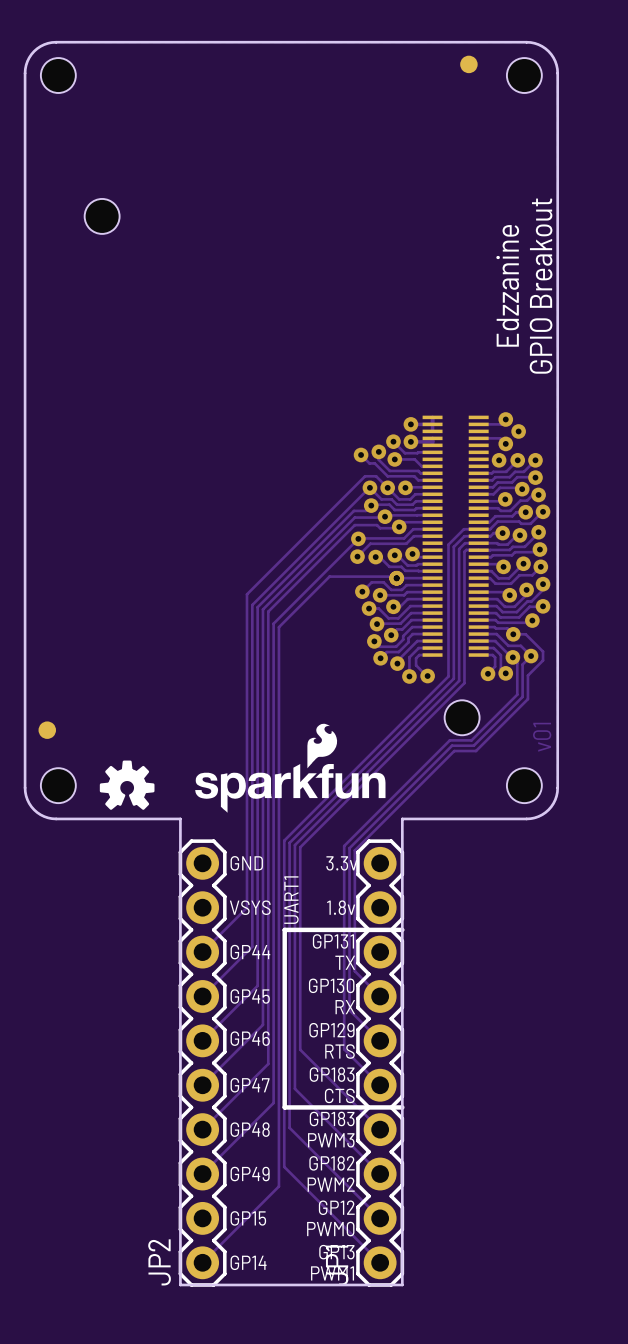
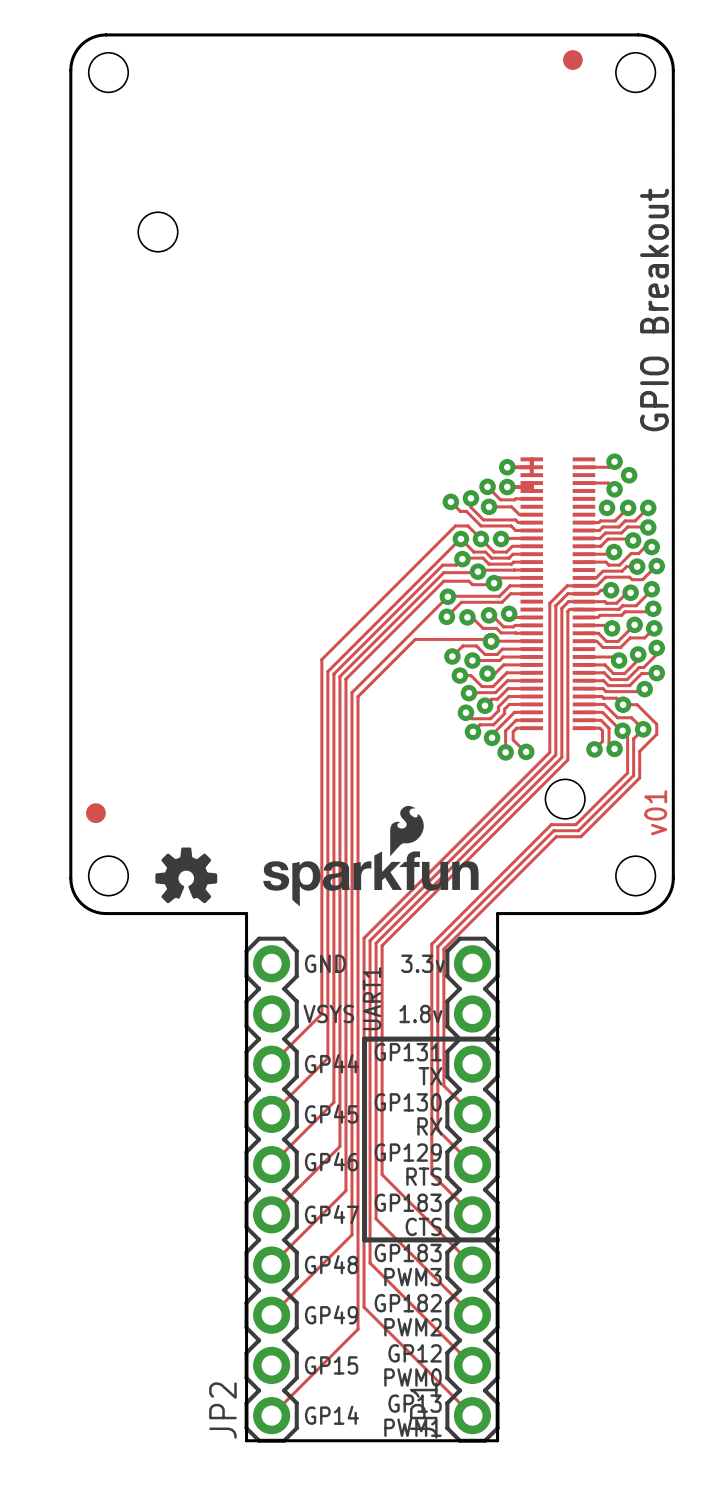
text: Edzzanine (507, 285) -> none

